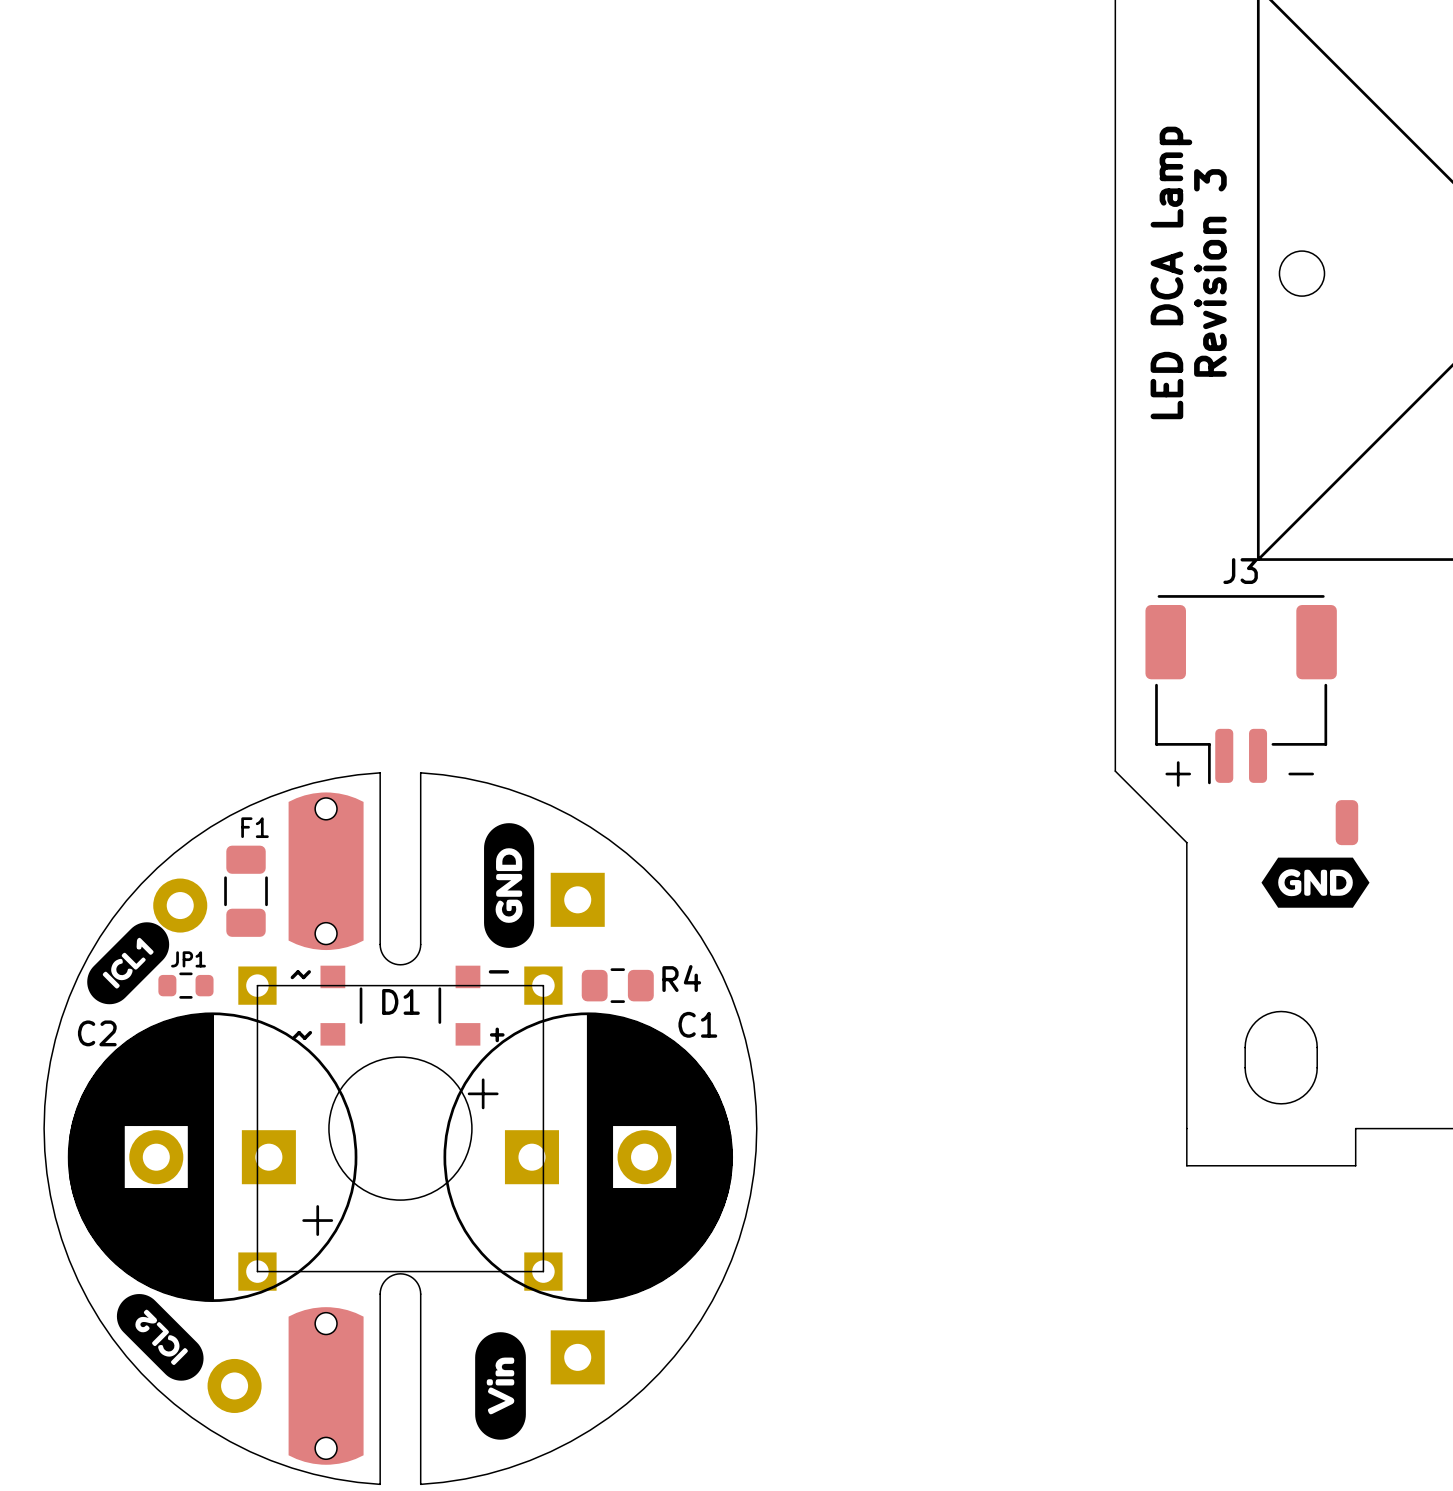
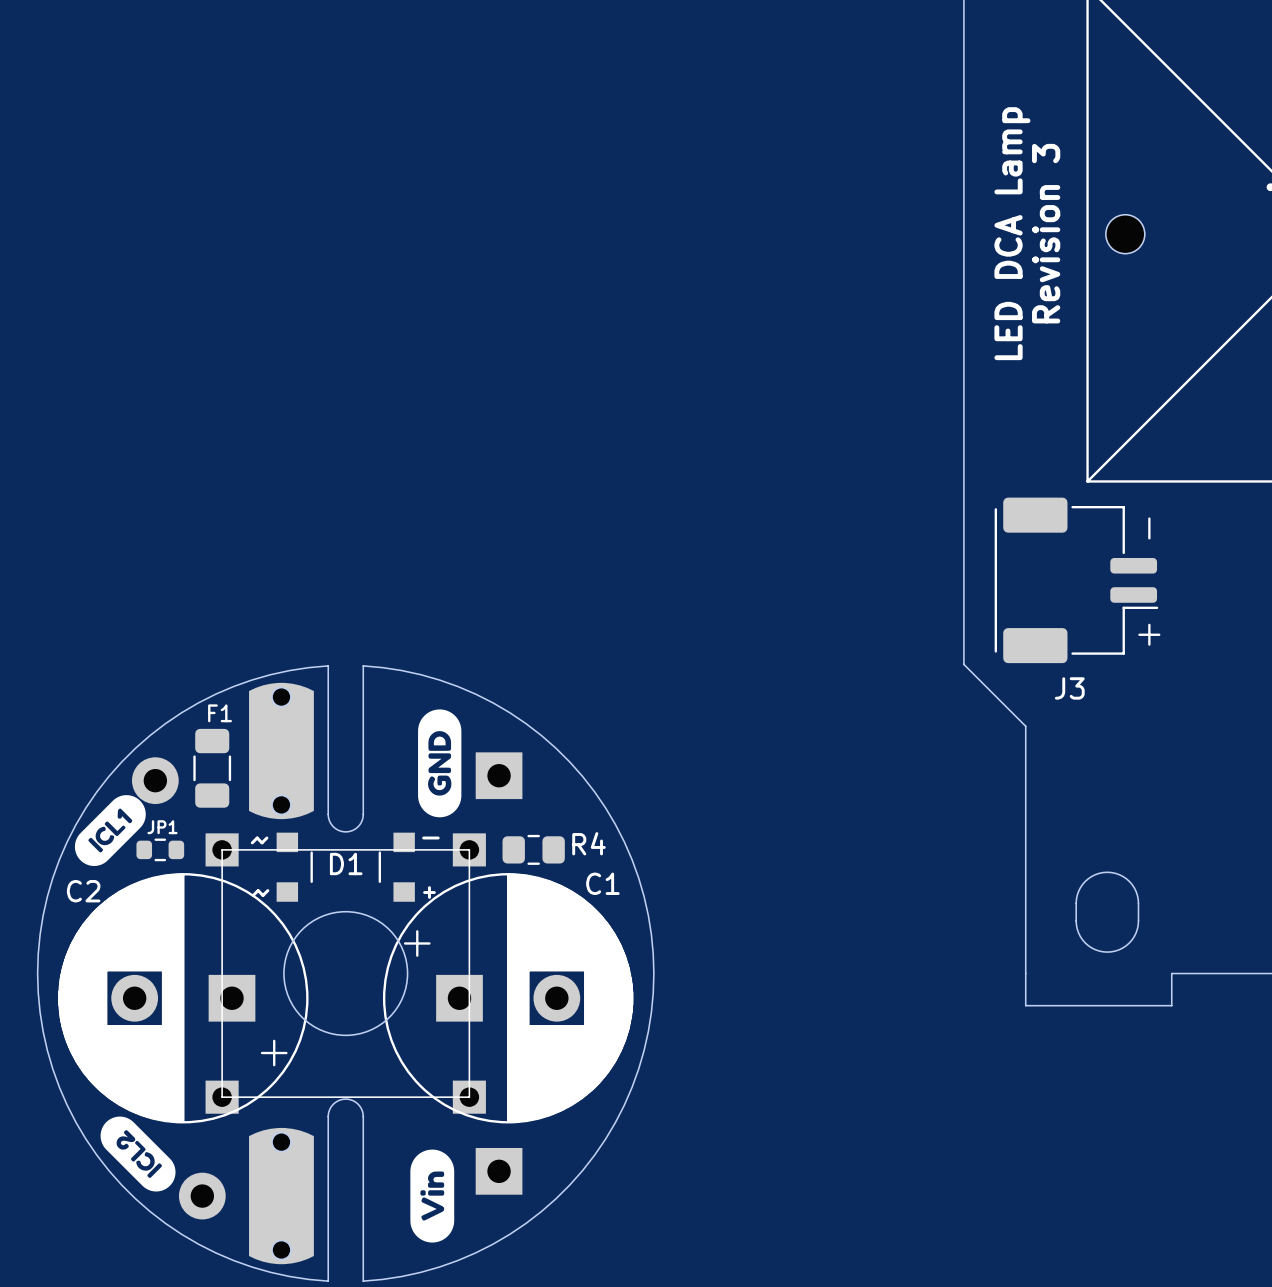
J3 name position: J3 (1240, 571) -> J3 (1069, 688)
line: none -> (1149, 518) (1149, 538)
J3 rotation: 0° (1241, 689) -> 90° counterclockwise (1076, 580)
line: (1178, 762) (1178, 785) -> (1149, 624) (1149, 644)
line: (1166, 774) (1189, 774) -> none
line: (1289, 774) (1312, 774) -> (1139, 634) (1159, 634)
part: (1346, 822) -> none
drawing: [1261, 857, 1370, 908] -> none

